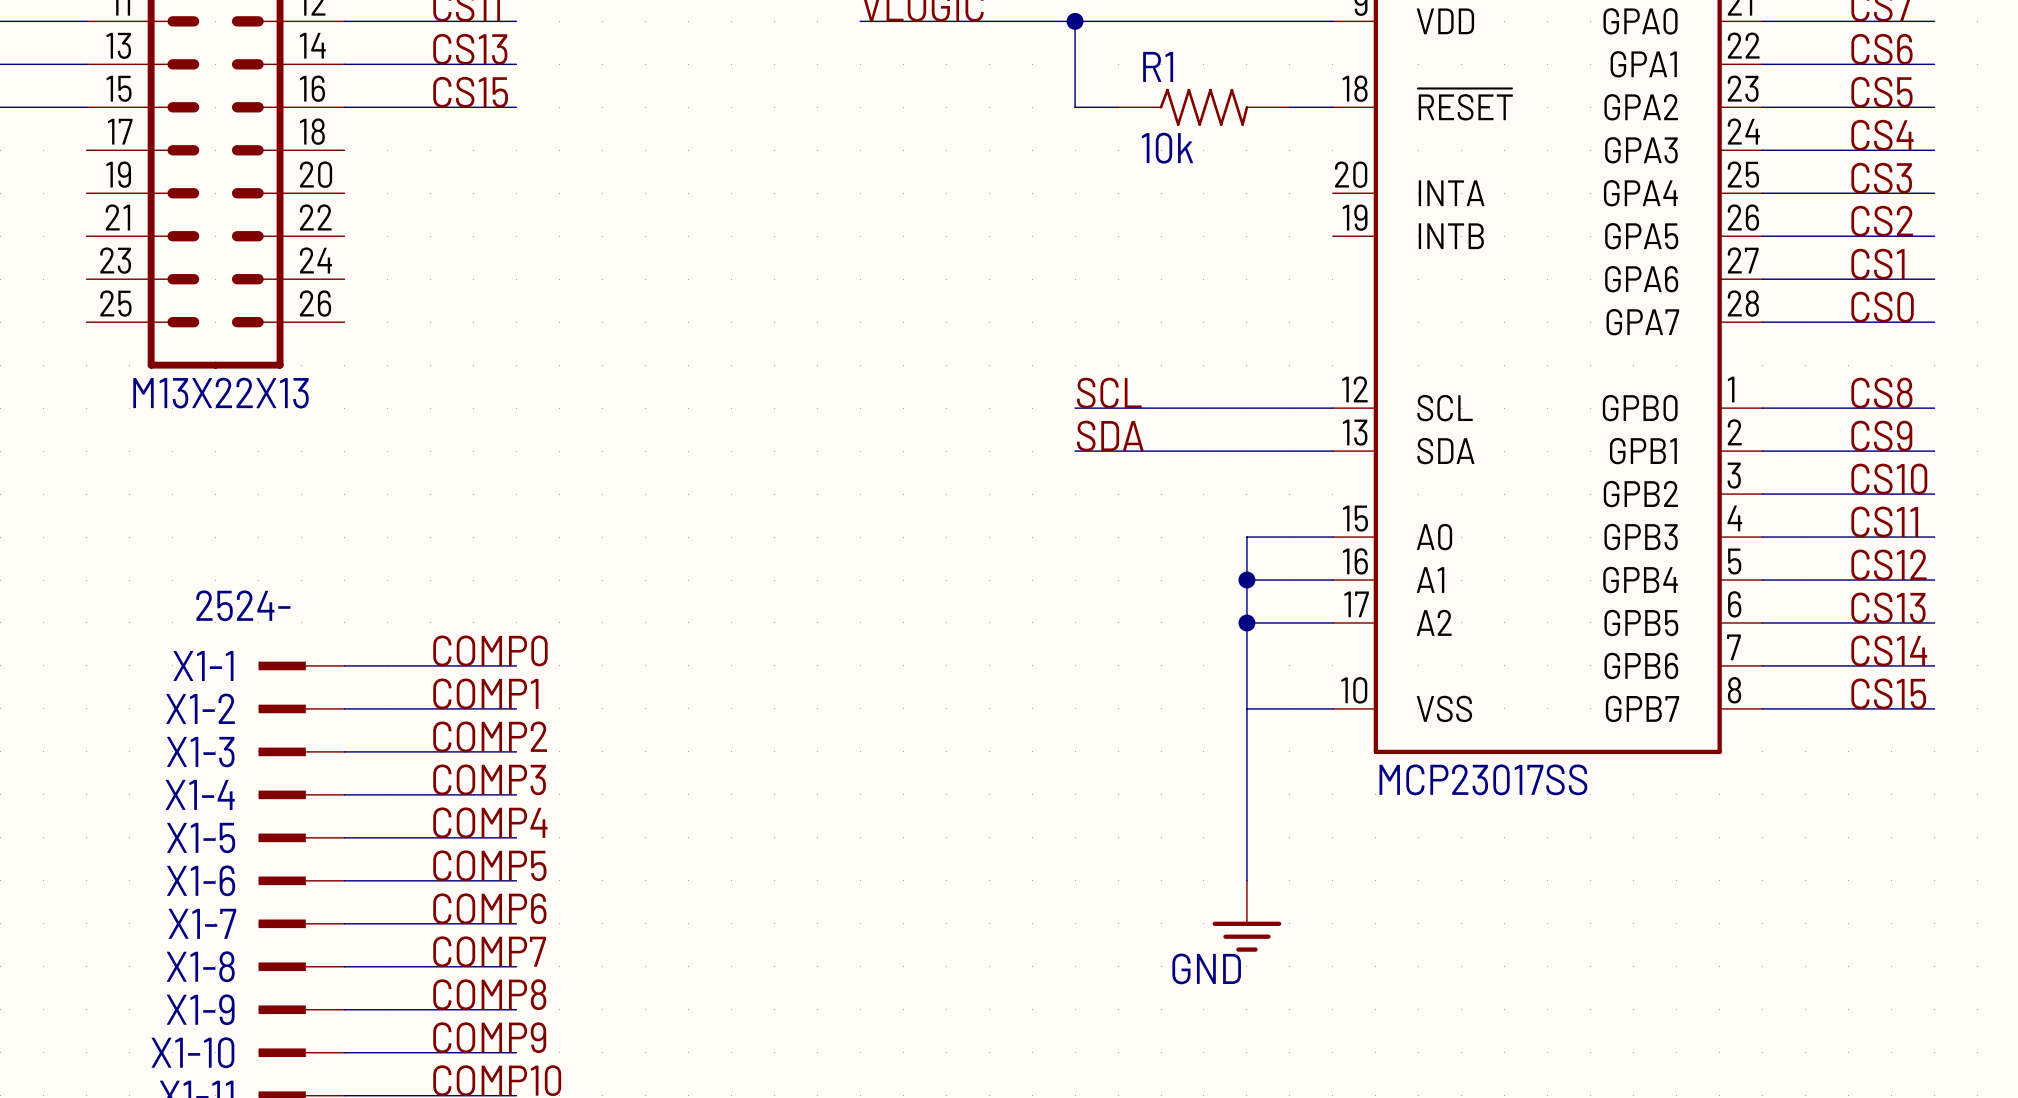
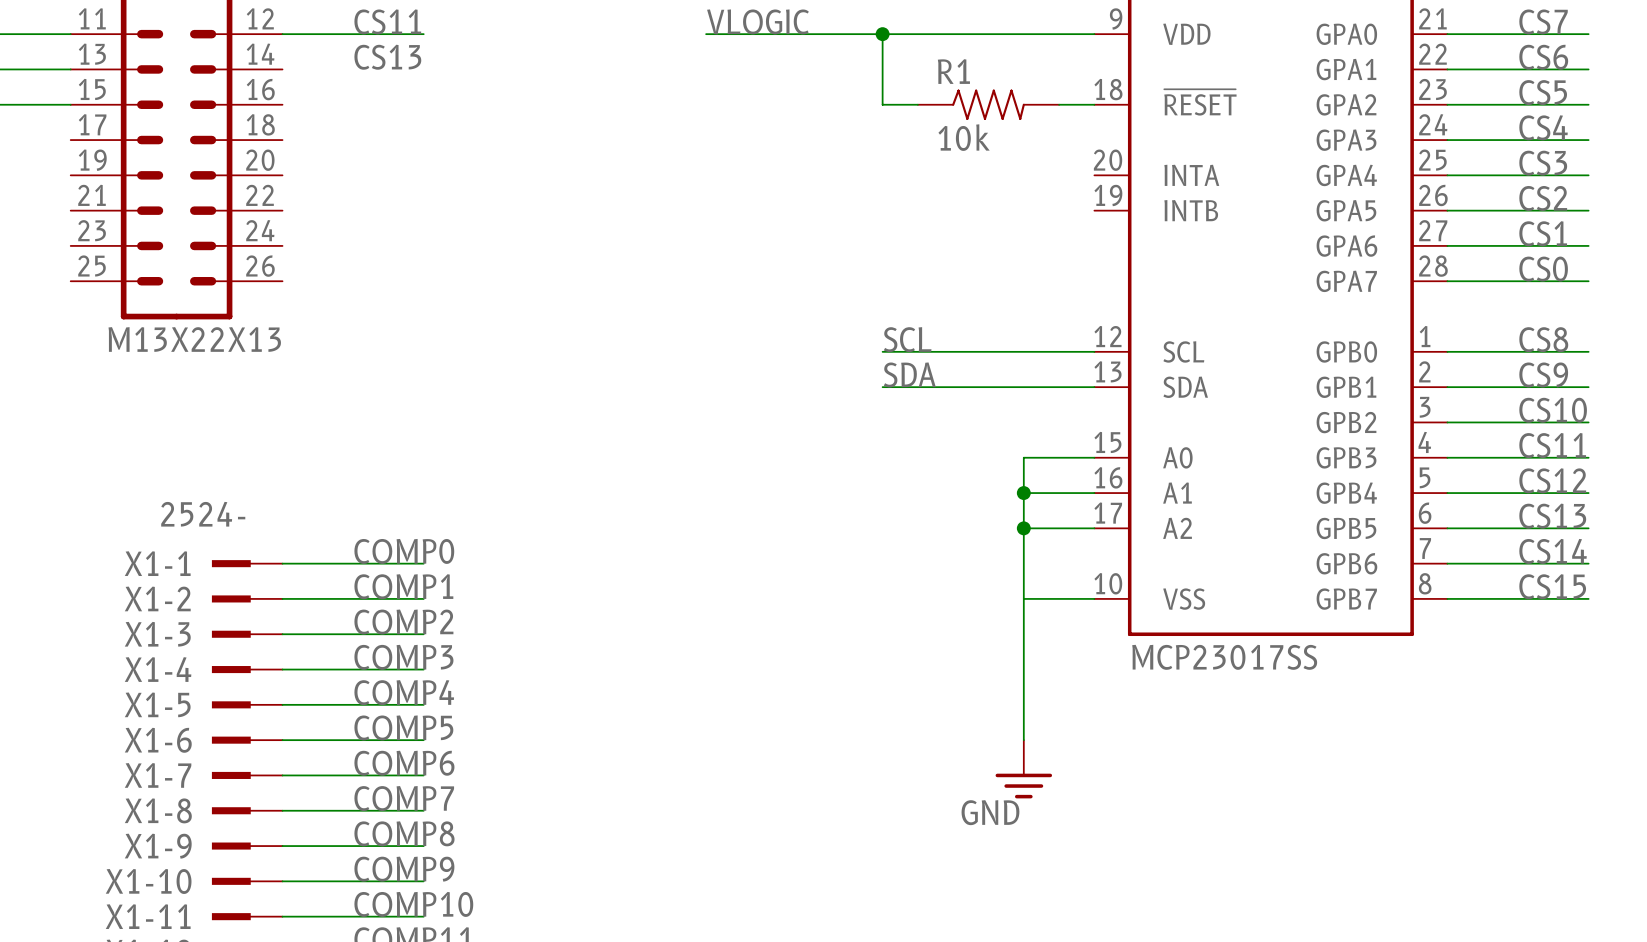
wire: (344, 64) (516, 64) -> none
label: CS15 (470, 92) -> none
wire: (344, 107) (516, 107) -> none

